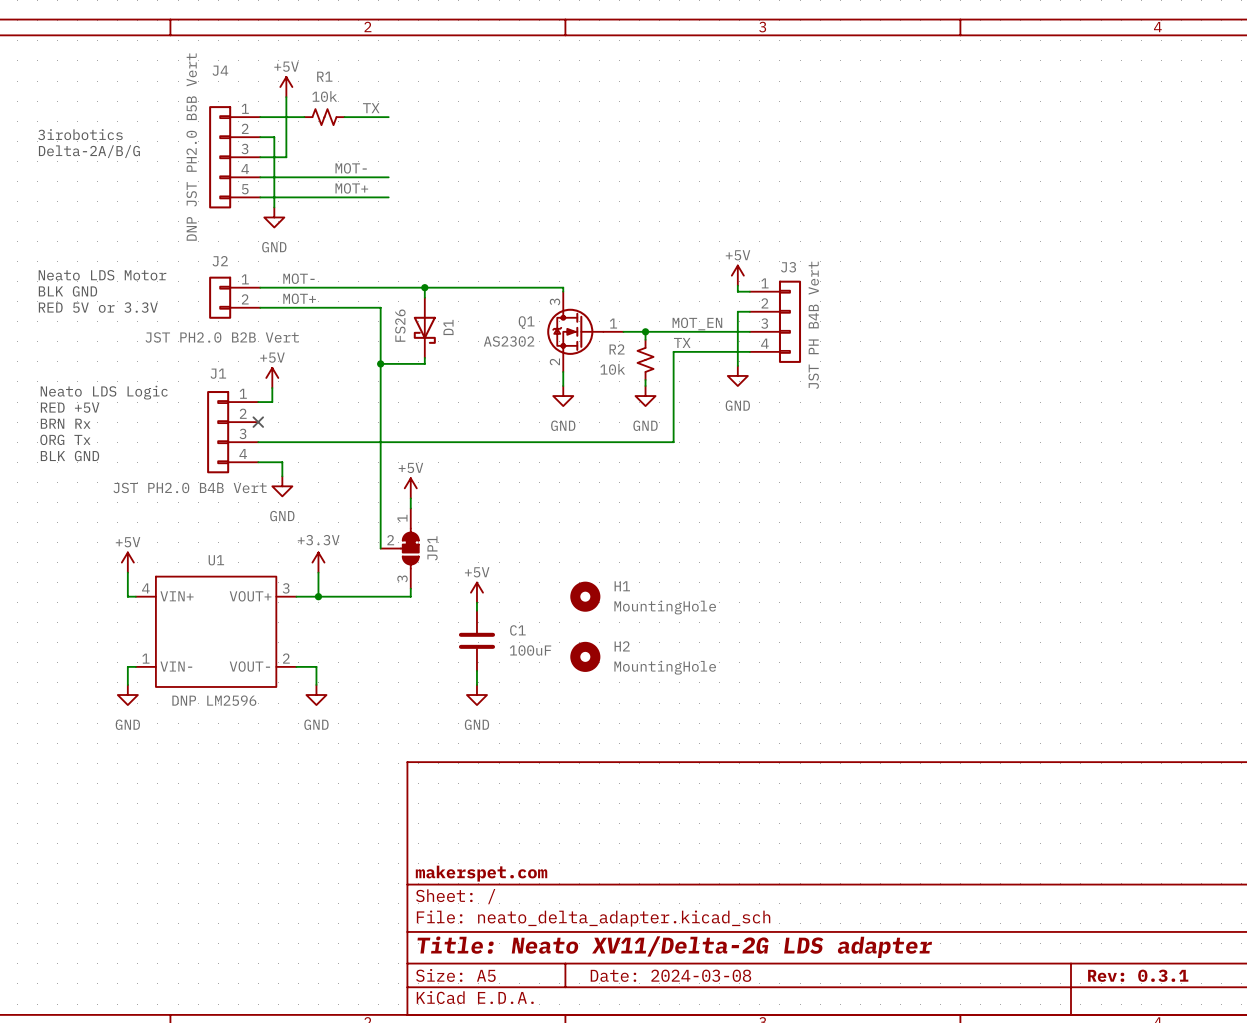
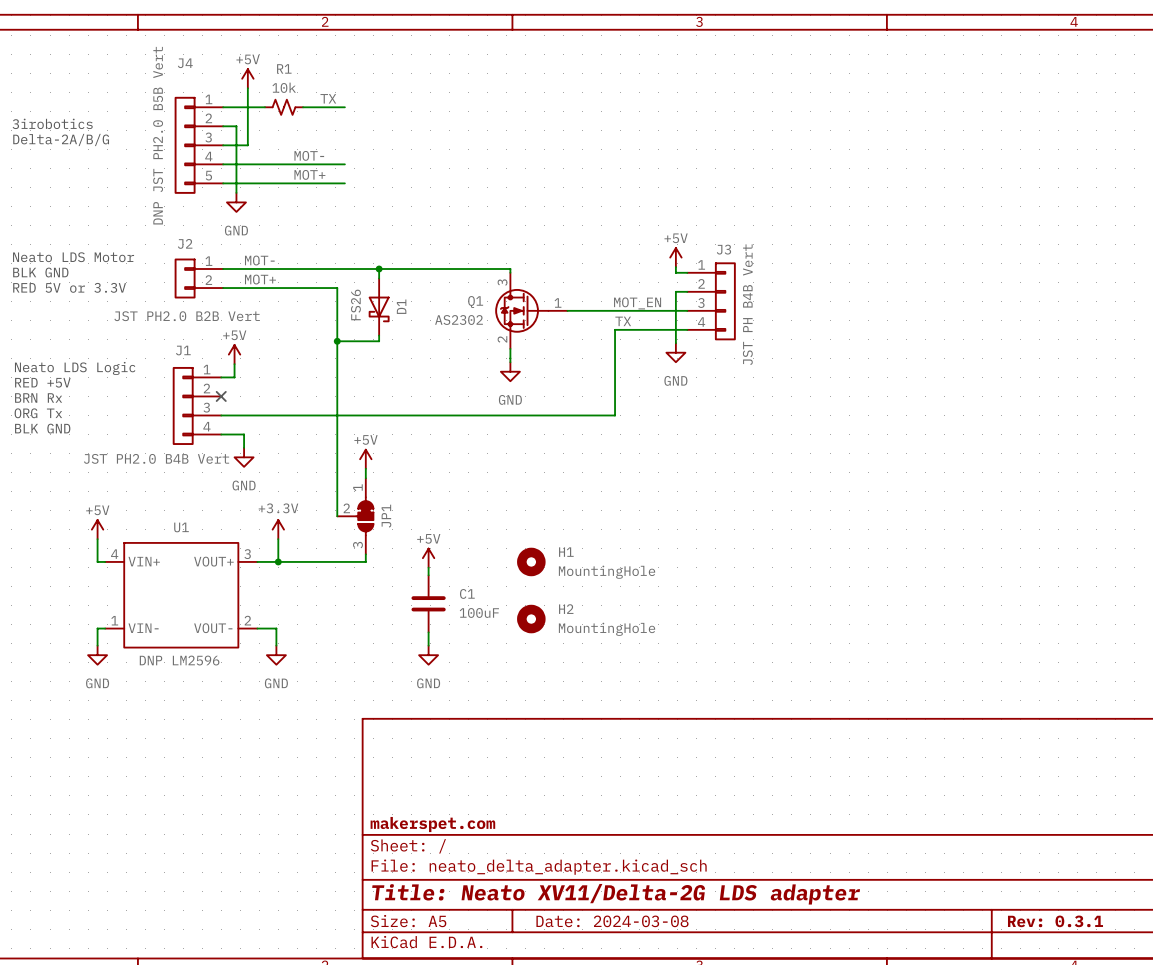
wire: (645, 331) (645, 339) -> none
junction: (645, 331) -> none
R2: 10k (645, 359) -> none
wire: (645, 379) (645, 386) -> none
power symbol: GND (645, 396) -> none

